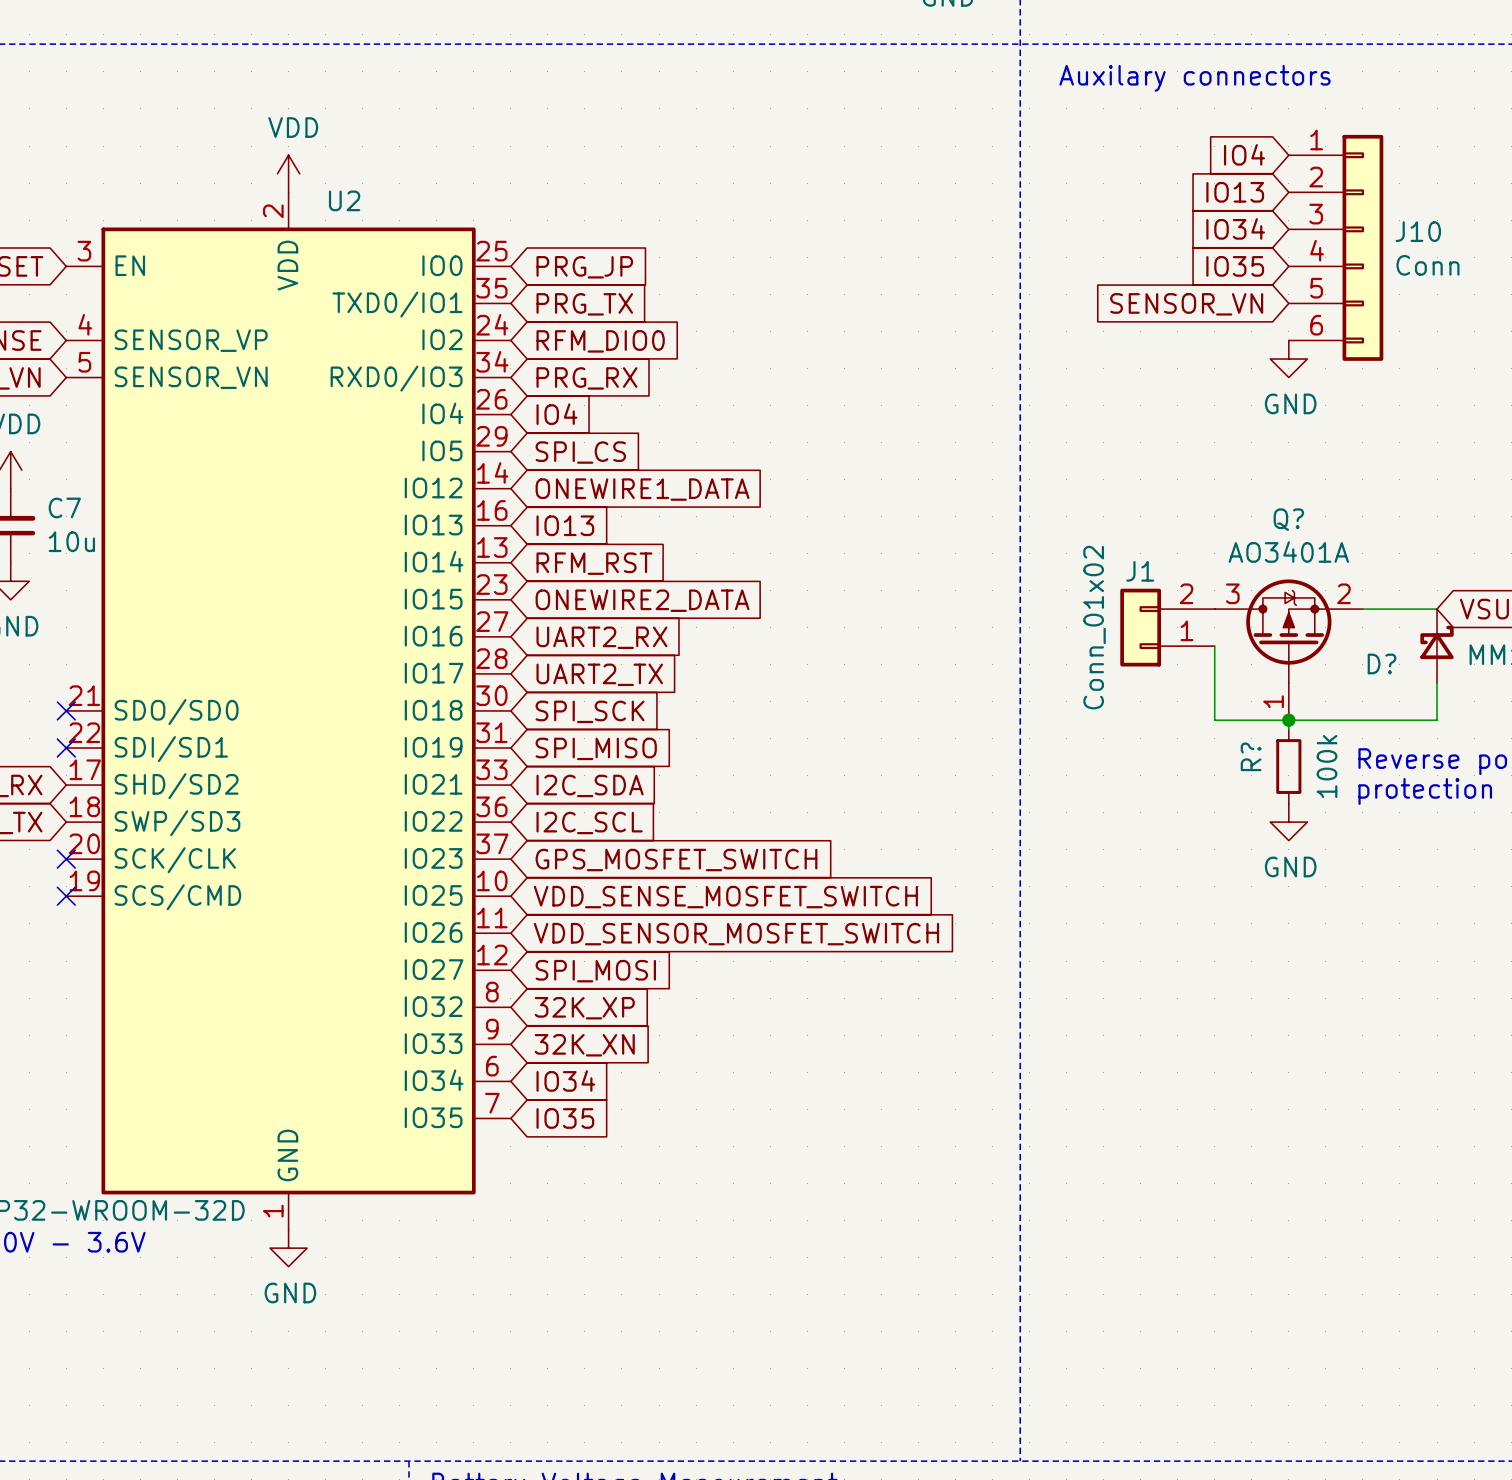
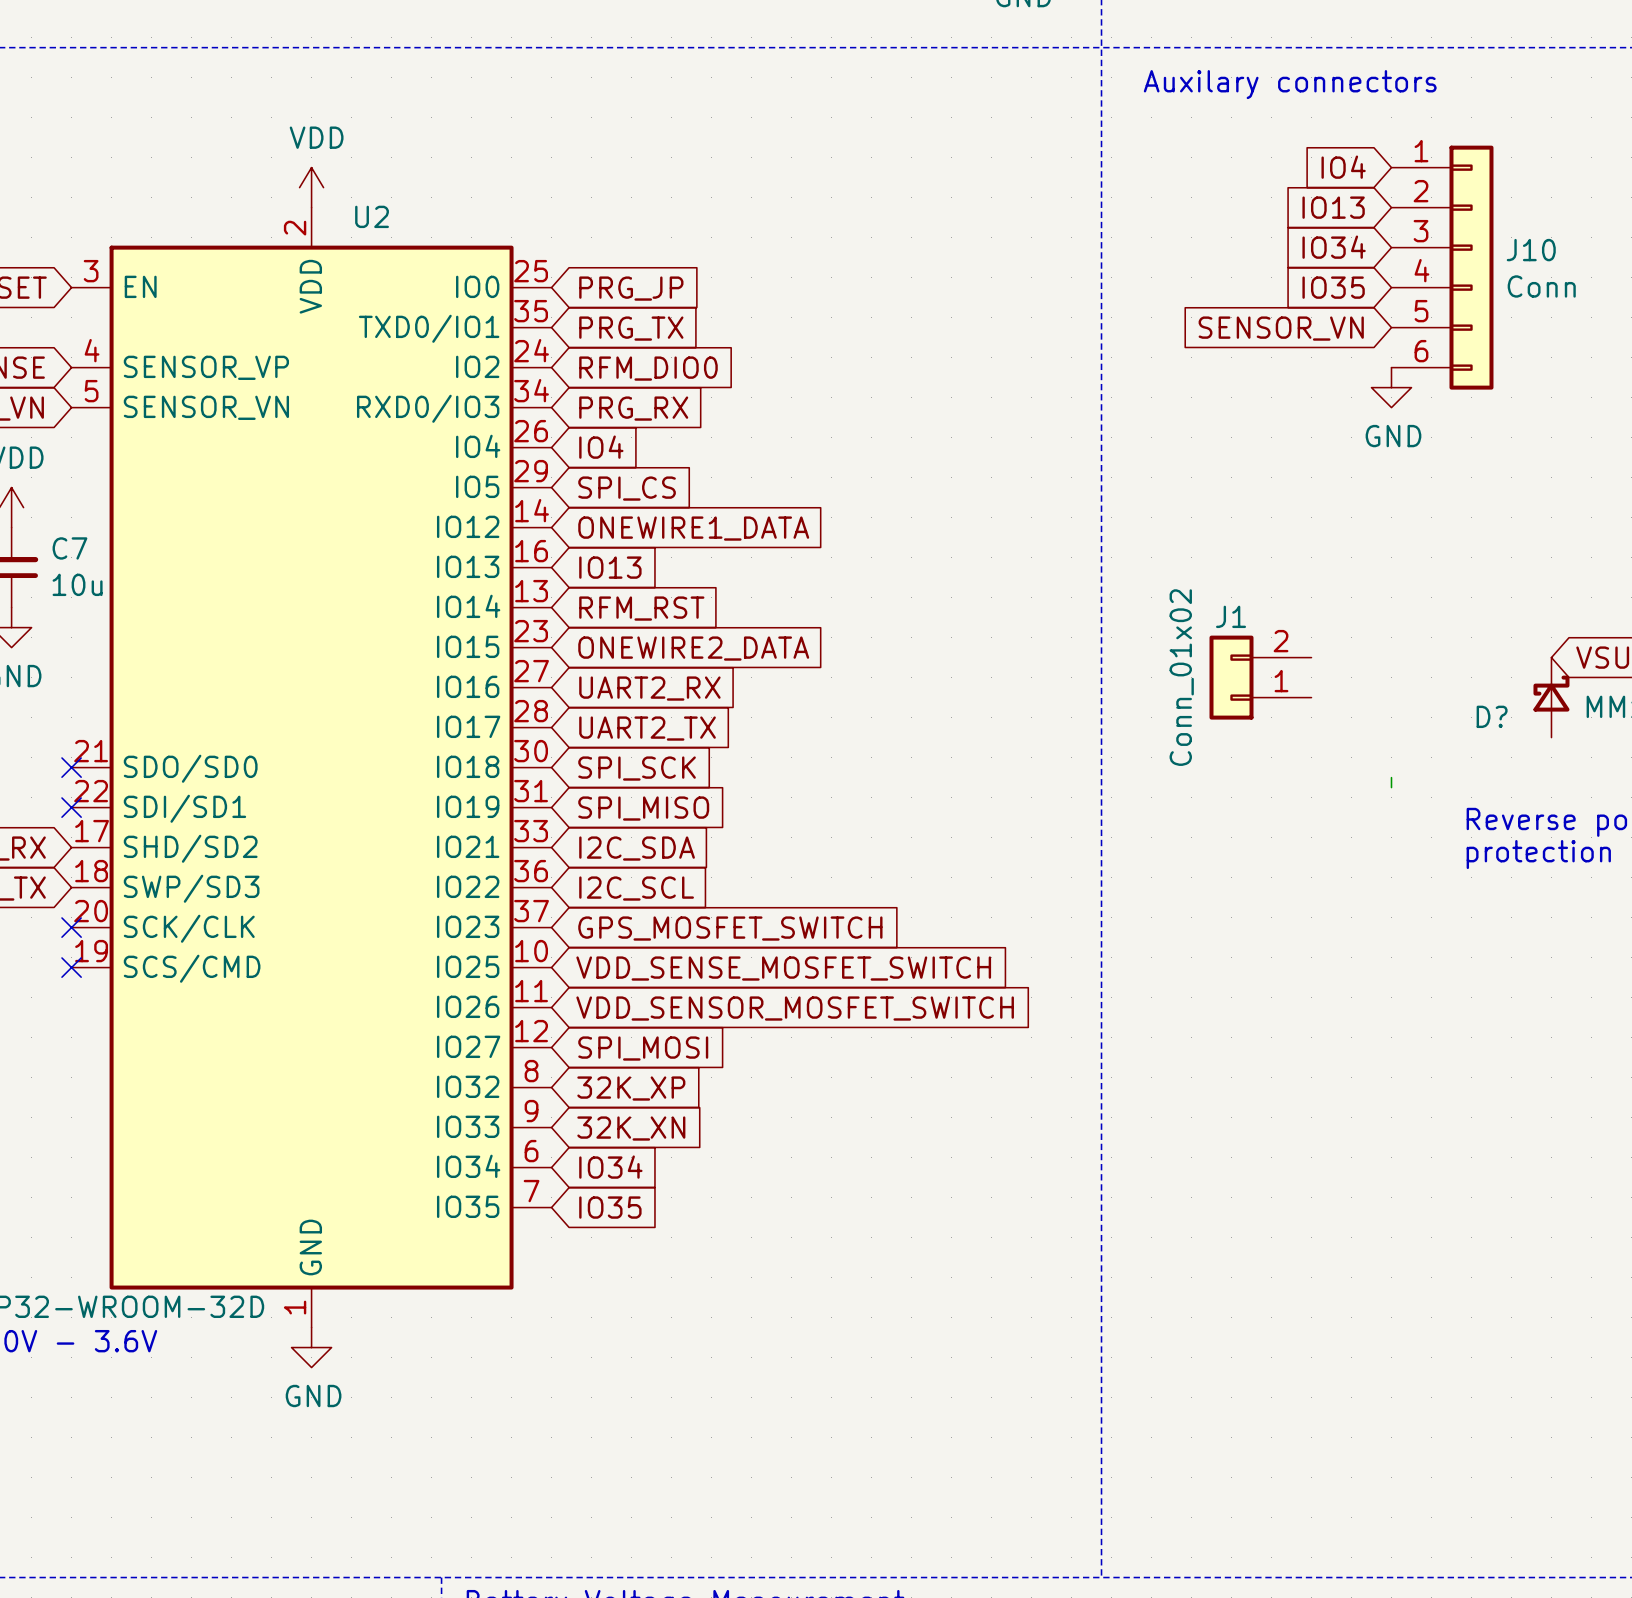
wire: (1362, 609) (1437, 609) -> none
wire: (1214, 646) (1214, 720) (1437, 720) (1437, 683) -> none
Q?: AO3401A (1288, 649) -> none
junction: (1288, 720) -> none
R?: 100k (1288, 766) -> none
power symbol: GND (1288, 822) -> none

